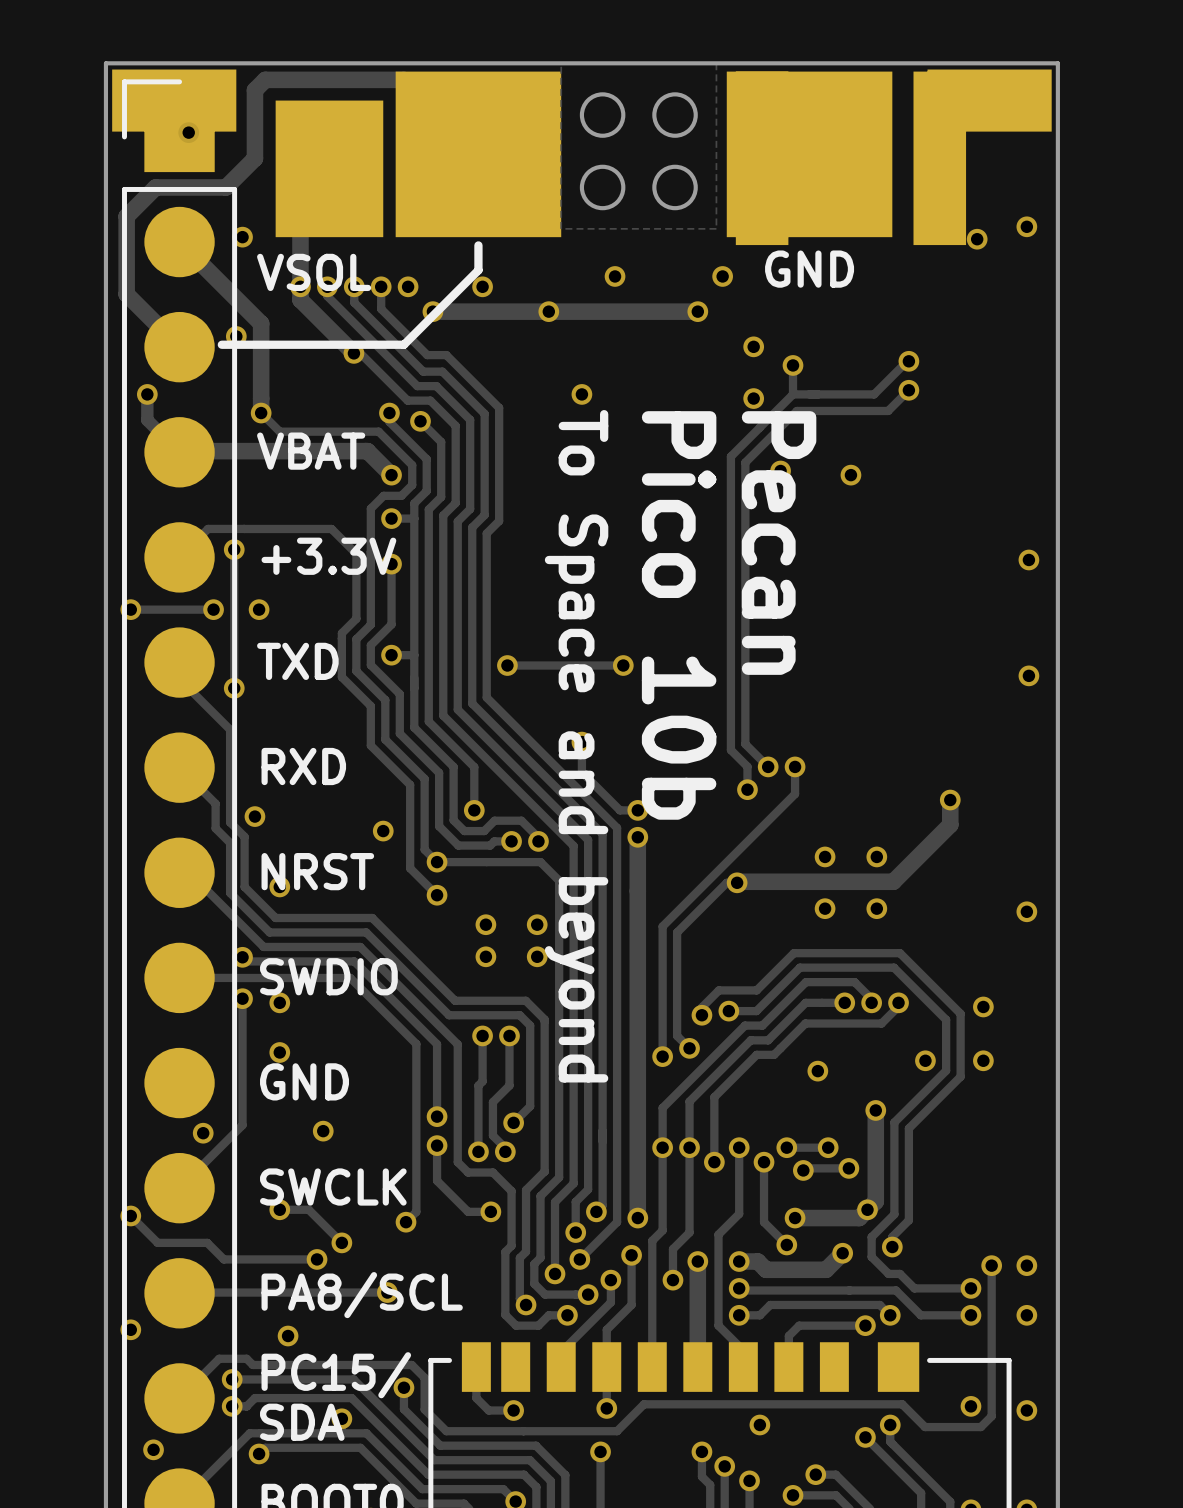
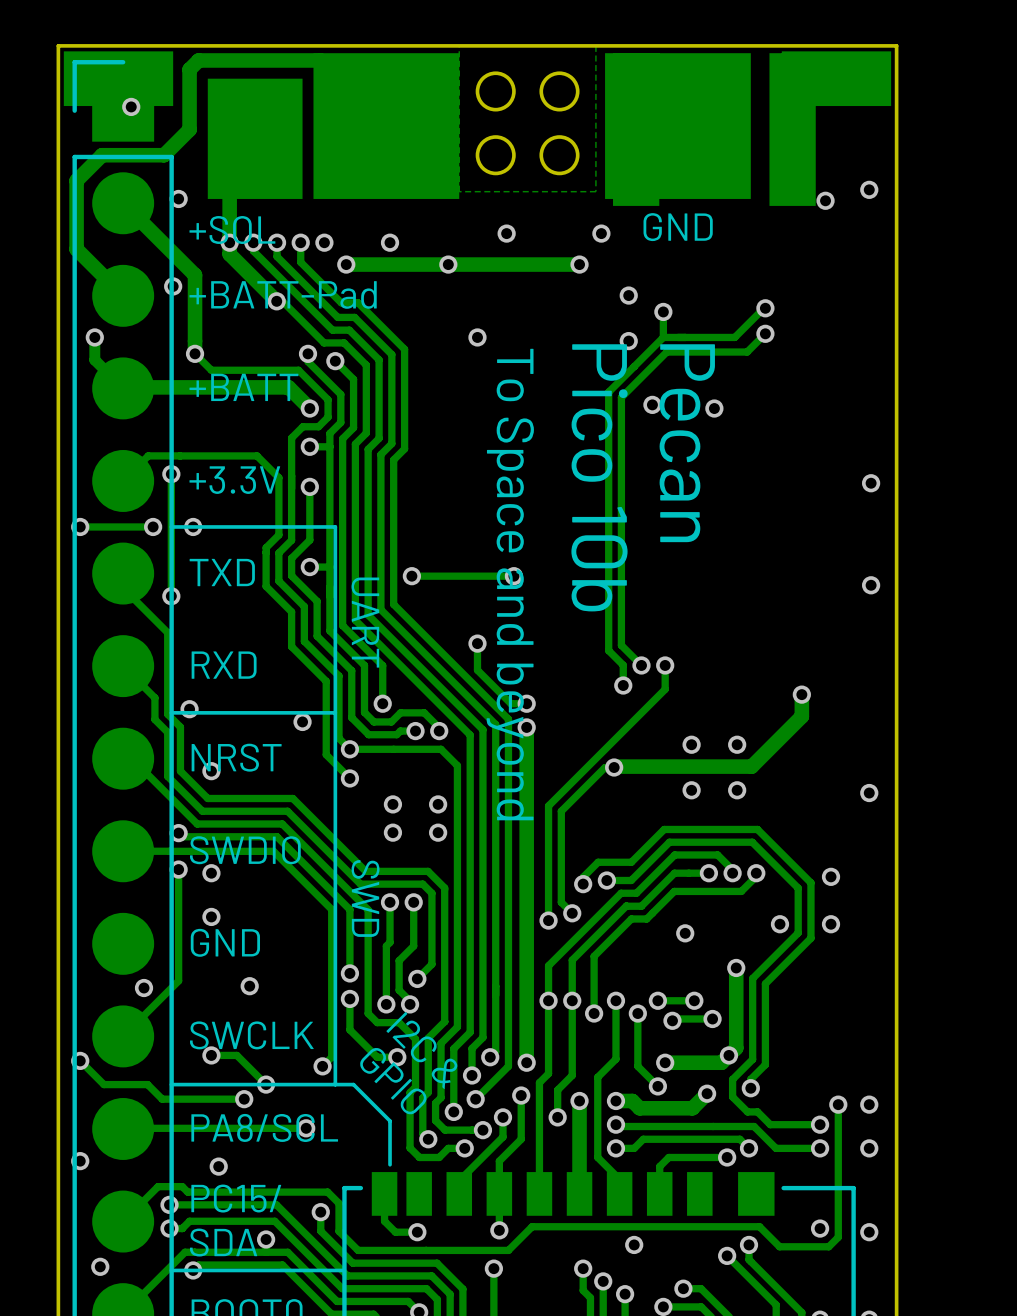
line: (478, 245) (478, 270) (403, 344) (221, 344) -> none
text: VSOL (314, 272) -> +SOL (232, 230)
text: none -> +BATT-Pad (283, 294)
text: VBAT (311, 451) -> +BATT (243, 387)
text position: Pecan (779, 543) -> Pecan (687, 443)
line: none -> (171, 526) (335, 526) (335, 1084)
text position: Pico 10b (679, 615) -> Pico 10b (599, 477)
text: none -> UART (365, 622)
text position: To Space and beyond (576, 746) -> To Space and beyond (510, 584)
line: none -> (335, 712) (171, 712)
text: none -> SWD (365, 898)
text: none -> I2C & (421, 1050)
text: none -> GPIO (393, 1081)
line: none -> (171, 1084) (353, 1084) (390, 1121) (390, 1164)
line: none -> (342, 1270) (171, 1270)

